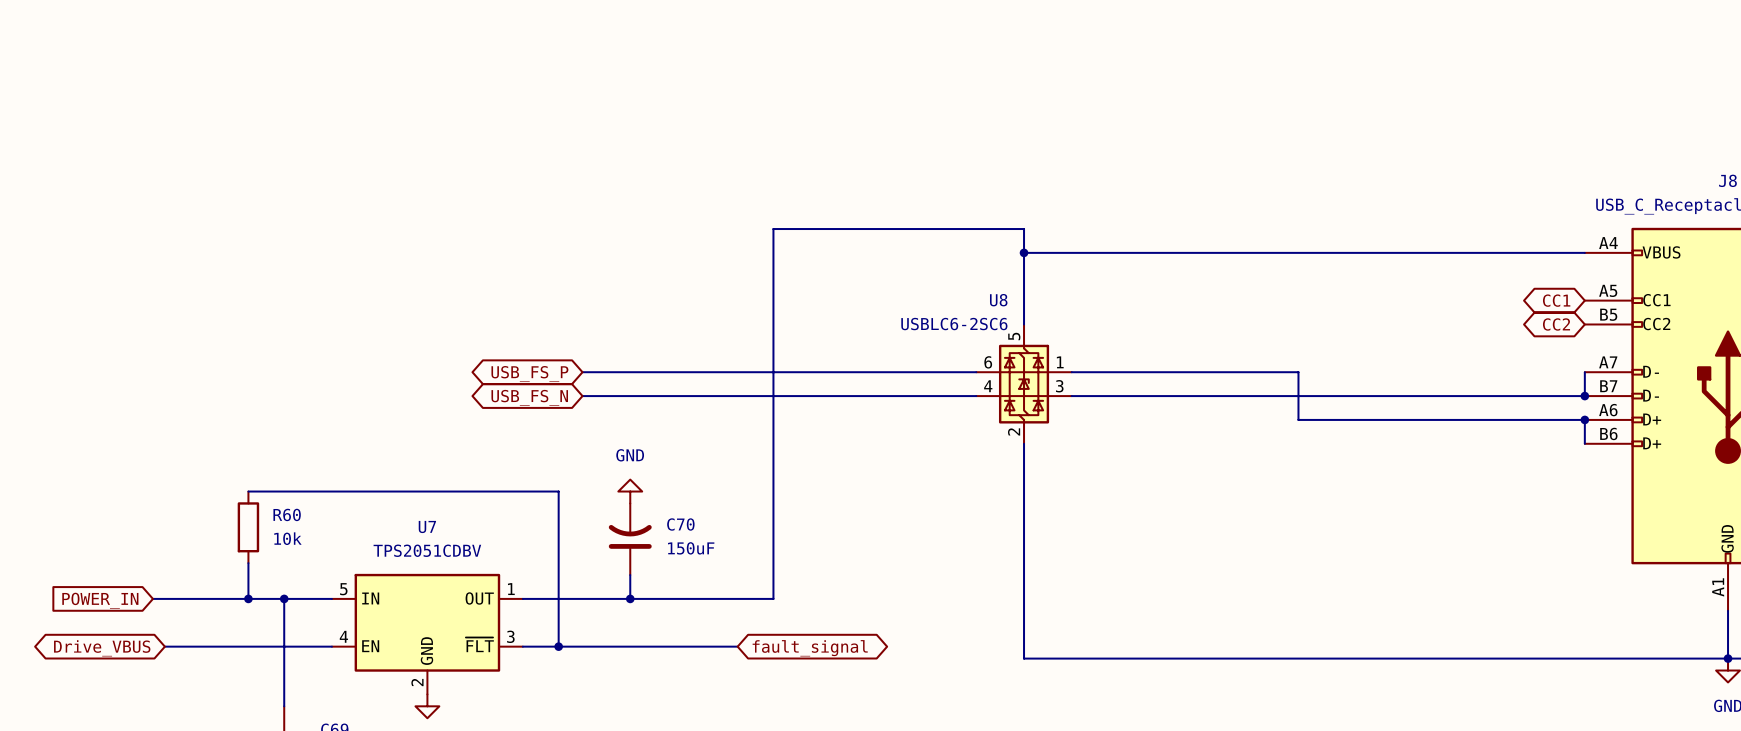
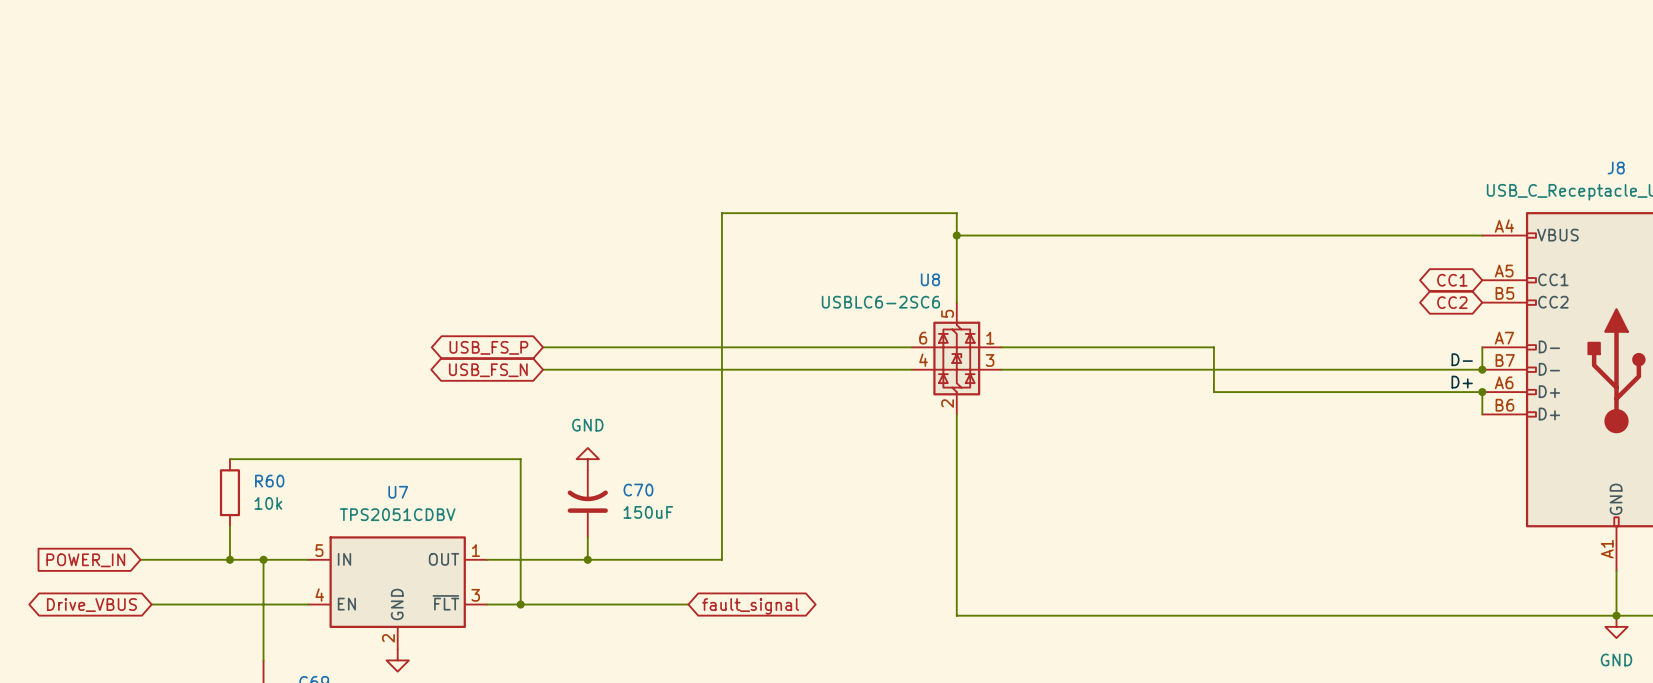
label: none -> D- (1462, 359)
label: none -> D+ (1462, 382)

